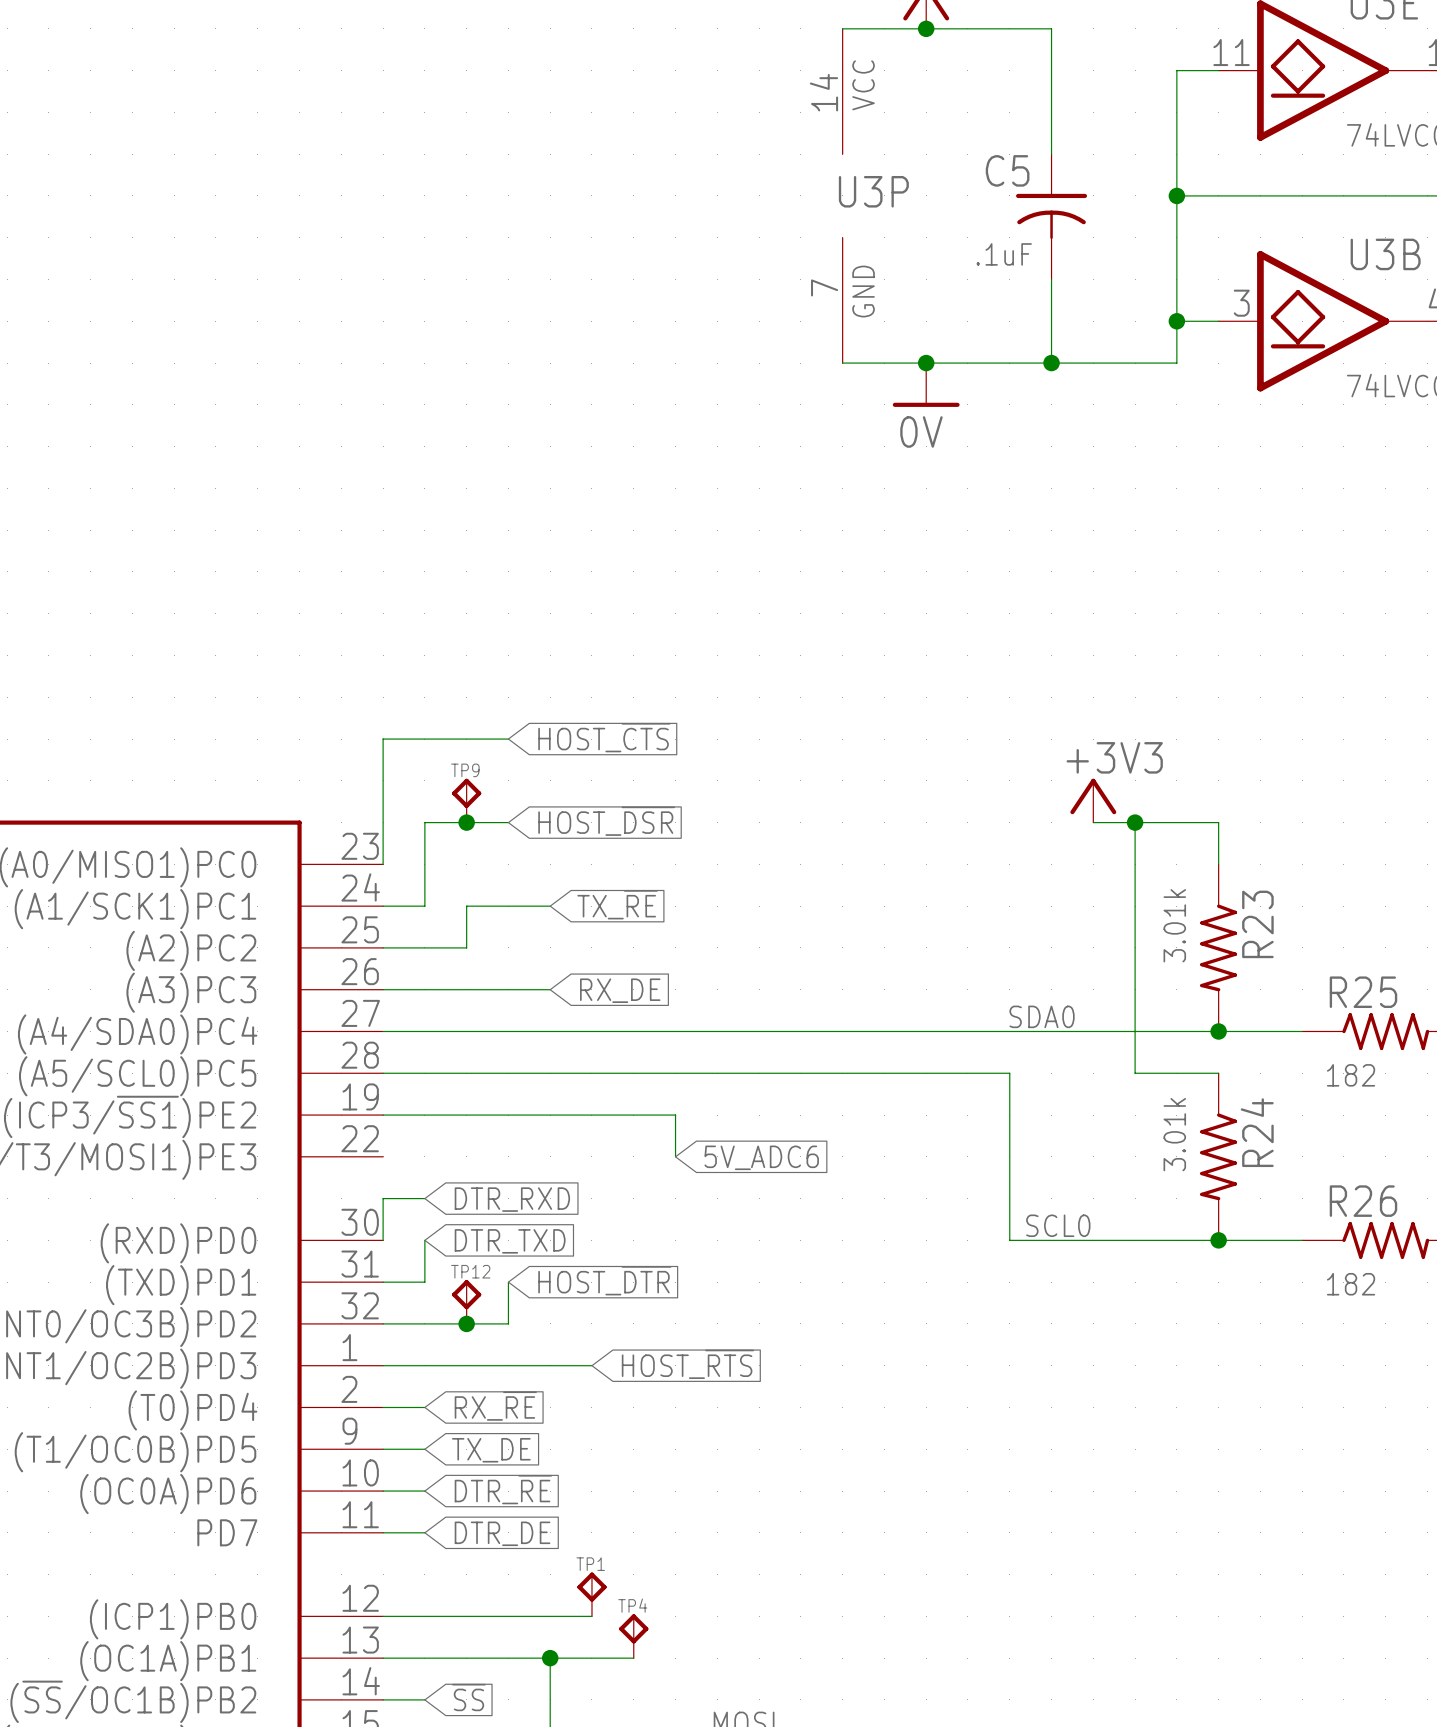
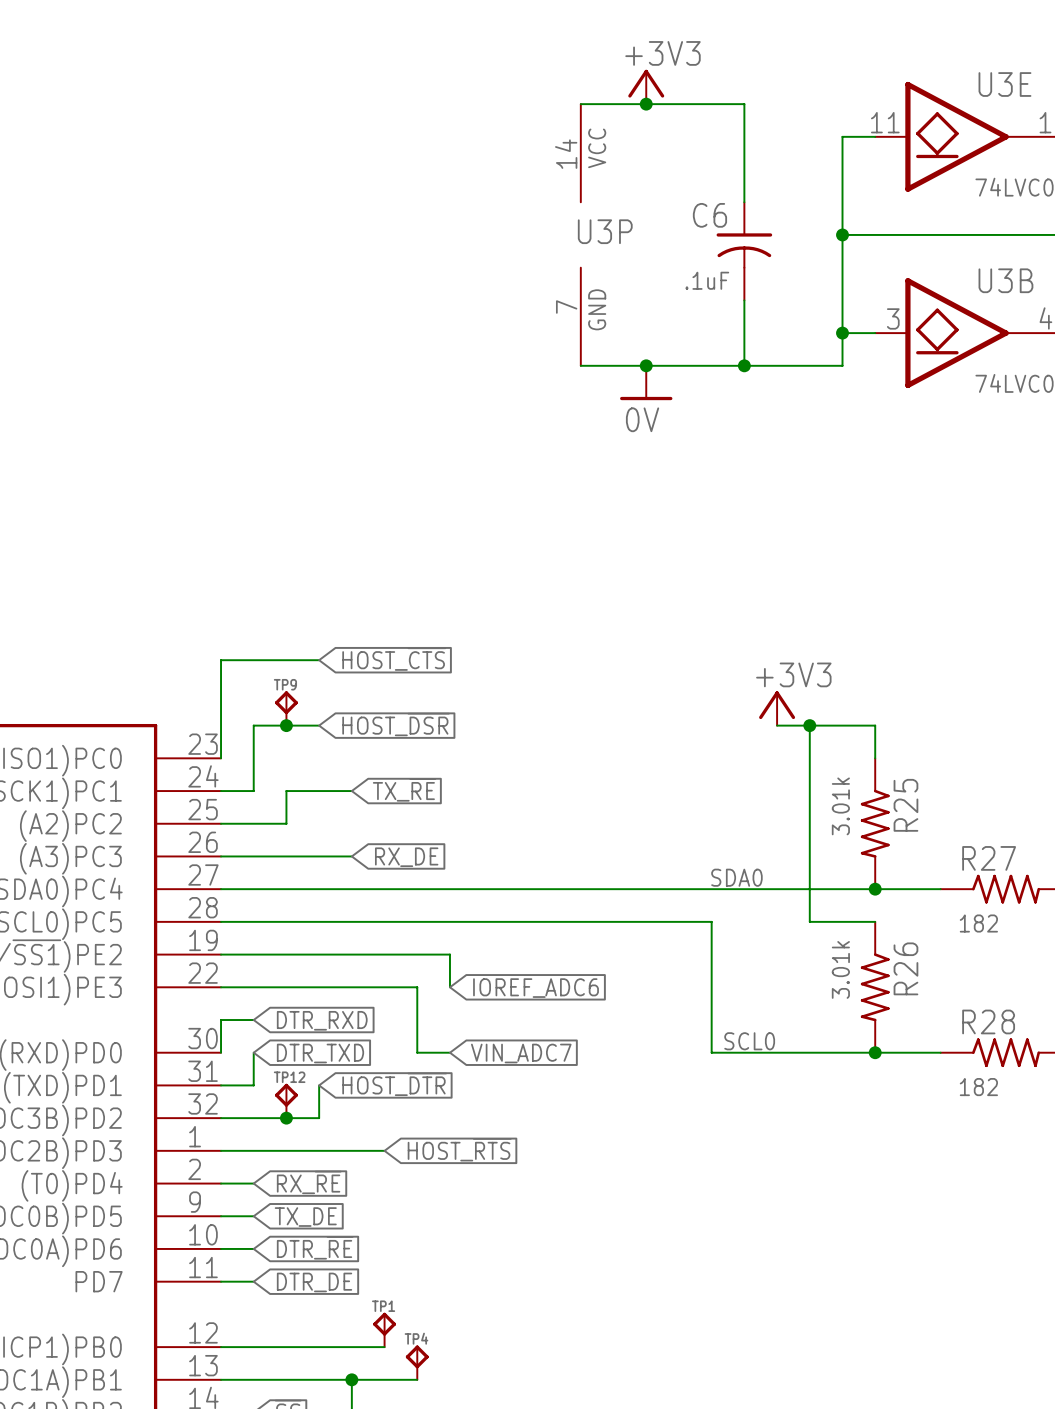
C5 name: C5 (1007, 170) -> C6 (709, 215)
R23 name: R23 (1257, 924) -> R25 (905, 805)
R25 name: R25 (1363, 992) -> R27 (989, 858)
R24 name: R24 (1257, 1132) -> R26 (905, 968)
wire: none -> (221, 987) (417, 987) (417, 1052) (449, 1052)
global label: 5V_ADC6 (761, 1157) -> IOREF_ADC6 (536, 988)
R26 name: R26 (1363, 1201) -> R28 (988, 1021)
global label: none -> VIN_ADC7 (521, 1053)

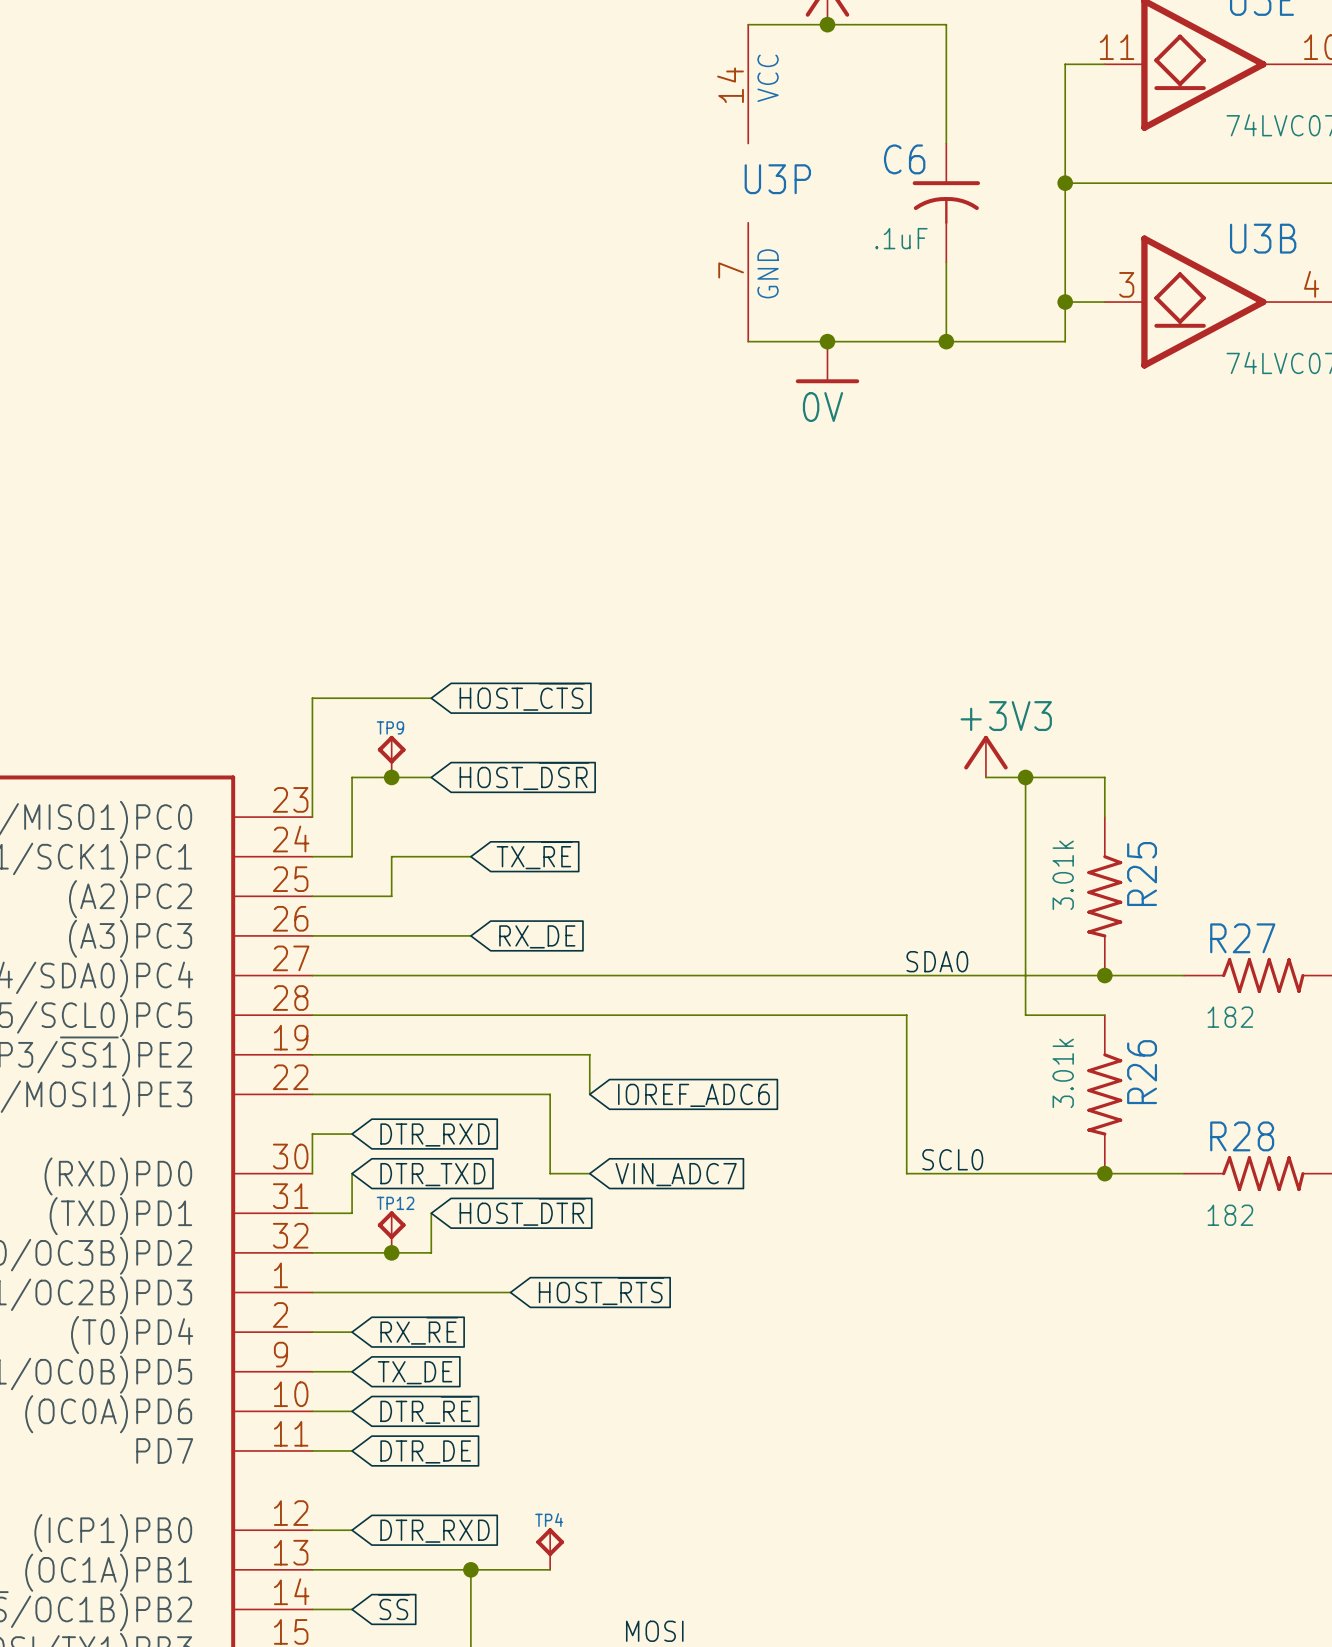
TP1: (384, 1329) -> none
wire: (253, 1347) (384, 1347) -> none
global label: none -> DTR_RXD (435, 1531)

